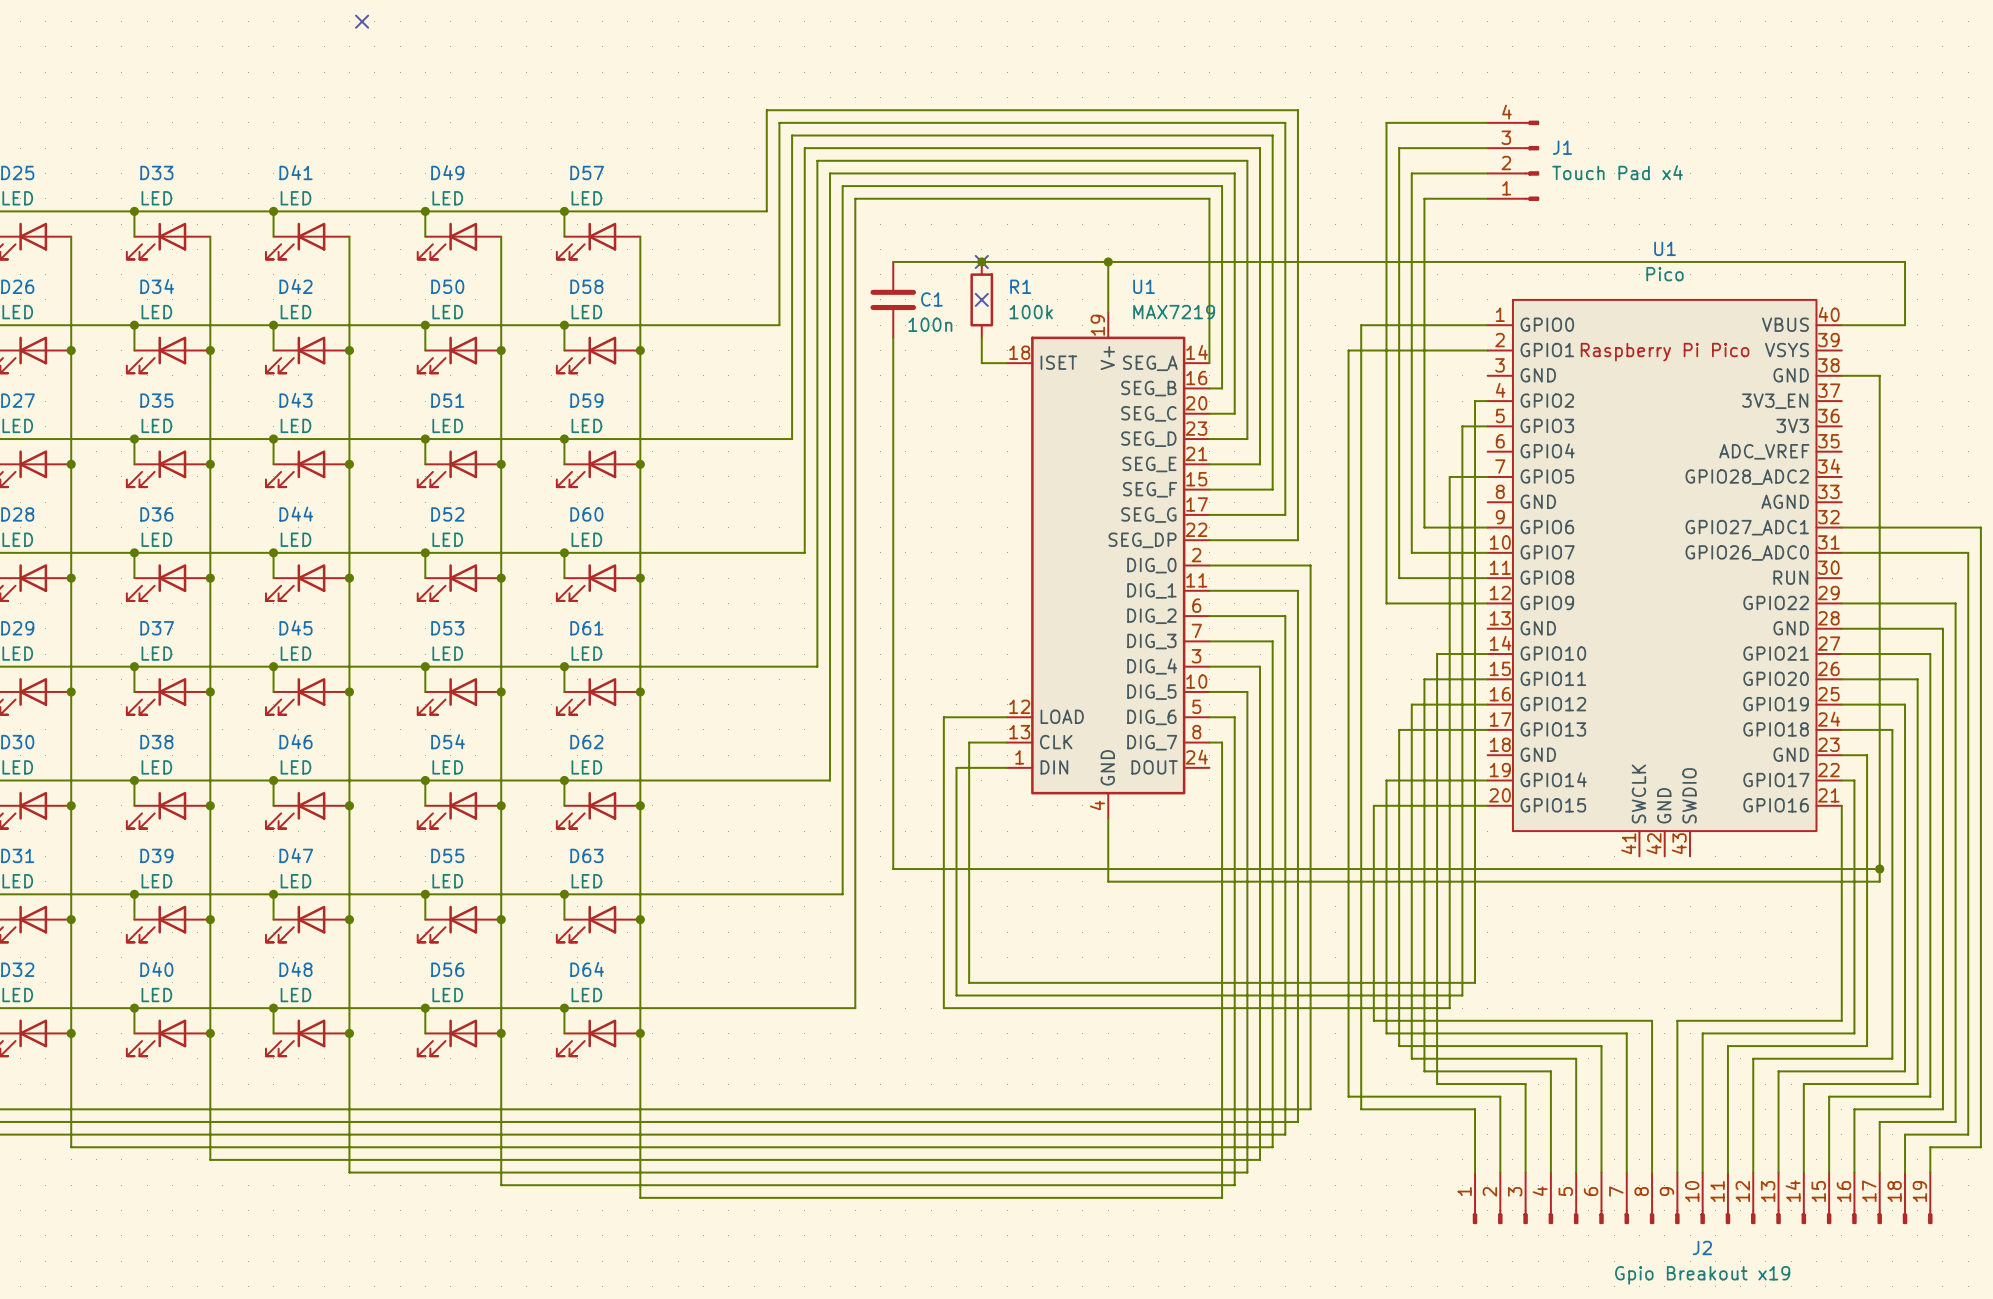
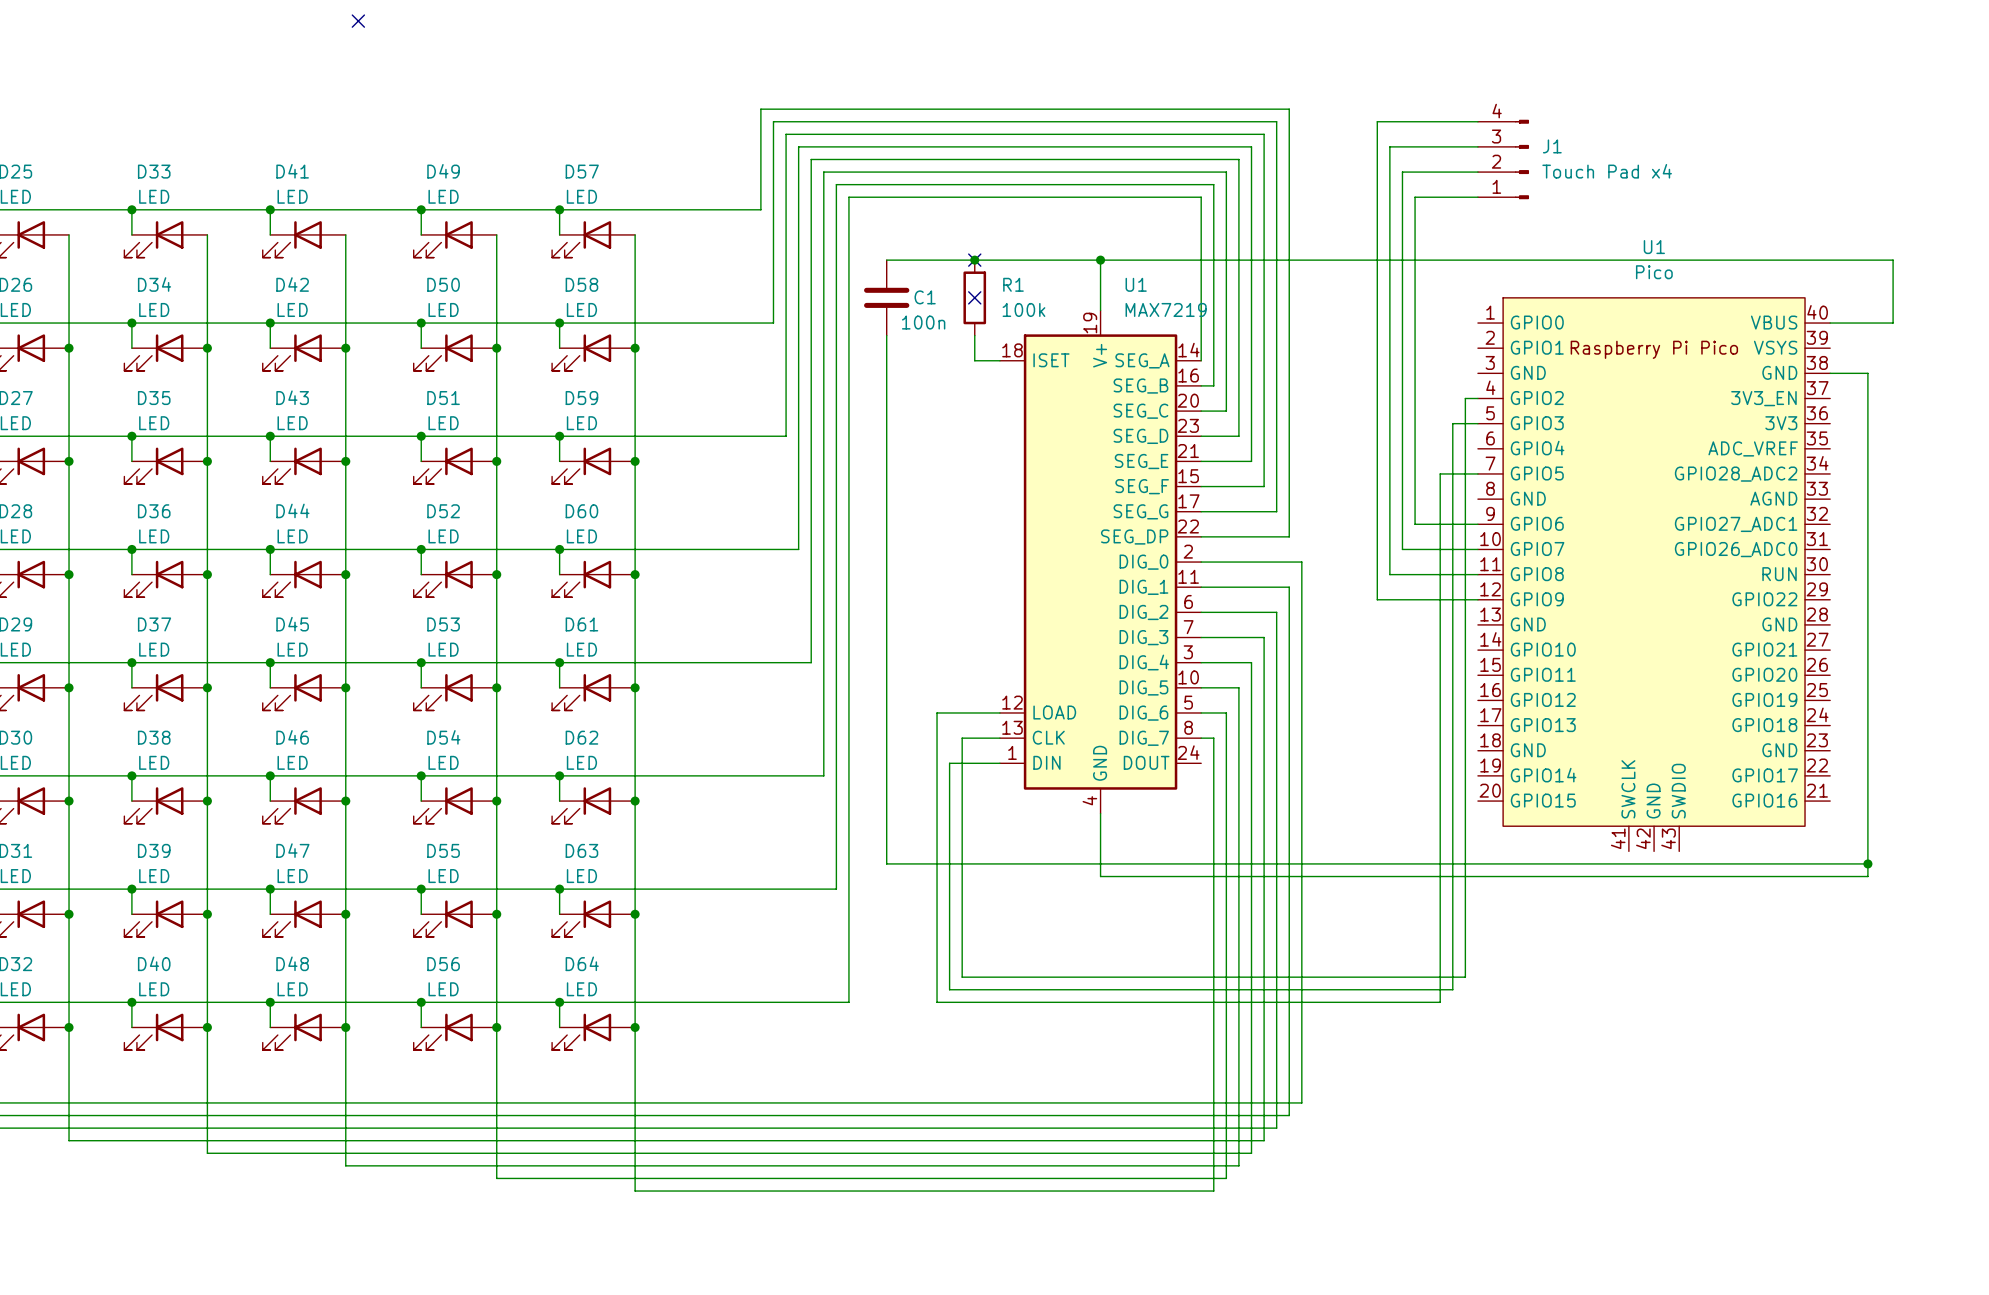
wire: (1487, 325) (1361, 325) (1361, 1109) (1475, 1109) (1475, 1172) -> none
wire: (1487, 350) (1348, 350) (1348, 1096) (1500, 1096) (1500, 1172) -> none
wire: (1841, 527) (1980, 527) (1980, 1147) (1930, 1147) (1930, 1172) -> none
wire: (1841, 552) (1968, 552) (1968, 1134) (1905, 1134) (1905, 1172) -> none
wire: (1841, 603) (1955, 603) (1955, 1121) (1879, 1121) (1879, 1172) -> none
wire: (1841, 628) (1942, 628) (1942, 1109) (1854, 1109) (1854, 1172) -> none
wire: (1487, 654) (1437, 654) (1437, 1084) (1525, 1084) (1525, 1172) -> none
wire: (1841, 654) (1930, 654) (1930, 1096) (1829, 1096) (1829, 1172) -> none
wire: (1487, 679) (1424, 679) (1424, 1071) (1550, 1071) (1550, 1172) -> none
wire: (1841, 679) (1917, 679) (1917, 1084) (1803, 1084) (1803, 1172) -> none
wire: (1487, 704) (1411, 704) (1411, 1058) (1576, 1058) (1576, 1172) -> none
wire: (1841, 704) (1905, 704) (1905, 1071) (1778, 1071) (1778, 1172) -> none
wire: (1487, 729) (1399, 729) (1399, 1046) (1601, 1046) (1601, 1172) -> none
wire: (1841, 729) (1892, 729) (1892, 1058) (1753, 1058) (1753, 1172) -> none
wire: (1841, 755) (1867, 755) (1867, 1046) (1727, 1046) (1727, 1172) -> none
wire: (1487, 780) (1386, 780) (1386, 1033) (1626, 1033) (1626, 1172) -> none
wire: (1841, 780) (1854, 780) (1854, 1033) (1702, 1033) (1702, 1172) -> none
wire: (1487, 805) (1373, 805) (1373, 1020) (1652, 1020) (1652, 1172) -> none
wire: (1841, 805) (1841, 1020) (1677, 1020) (1677, 1172) -> none
J2: Gpio Breakout x19 (1702, 1198) -> none

